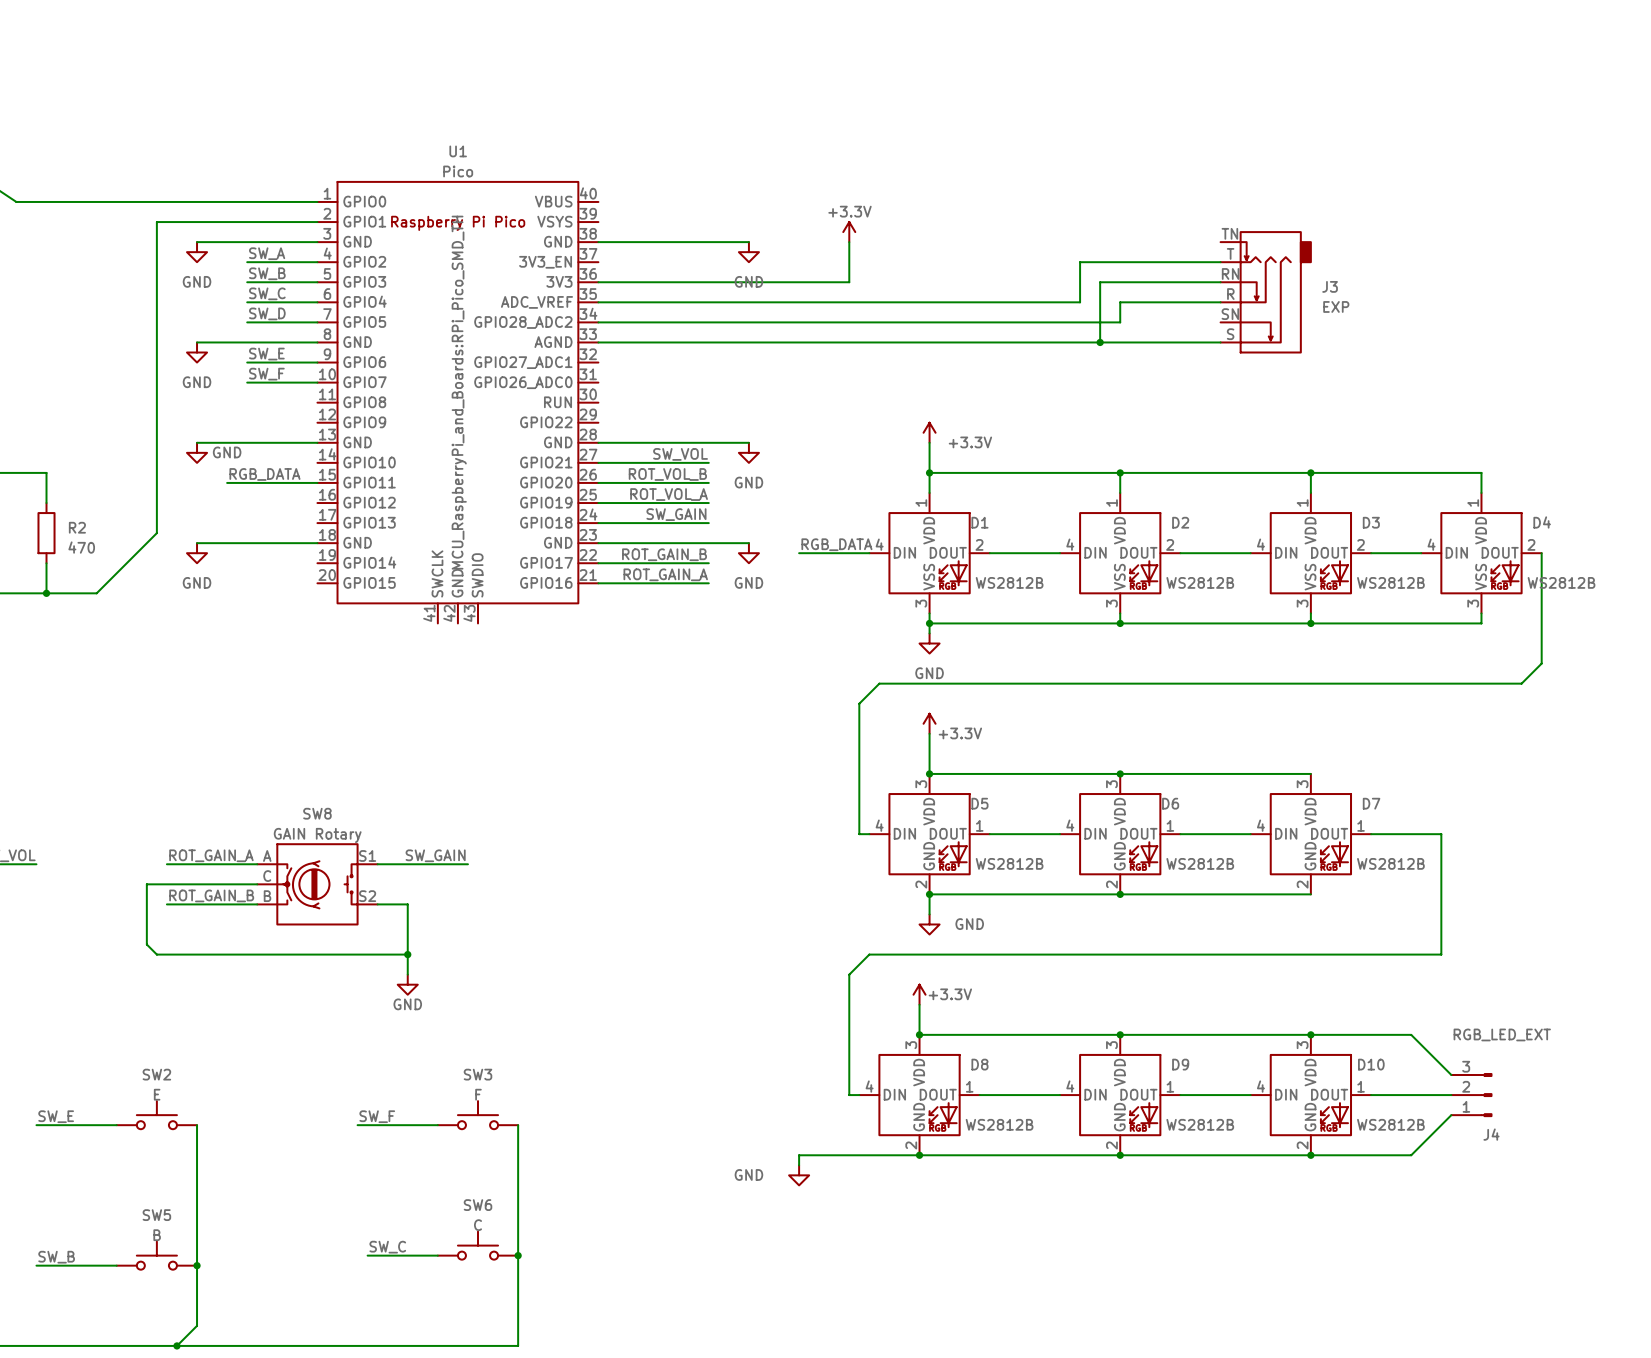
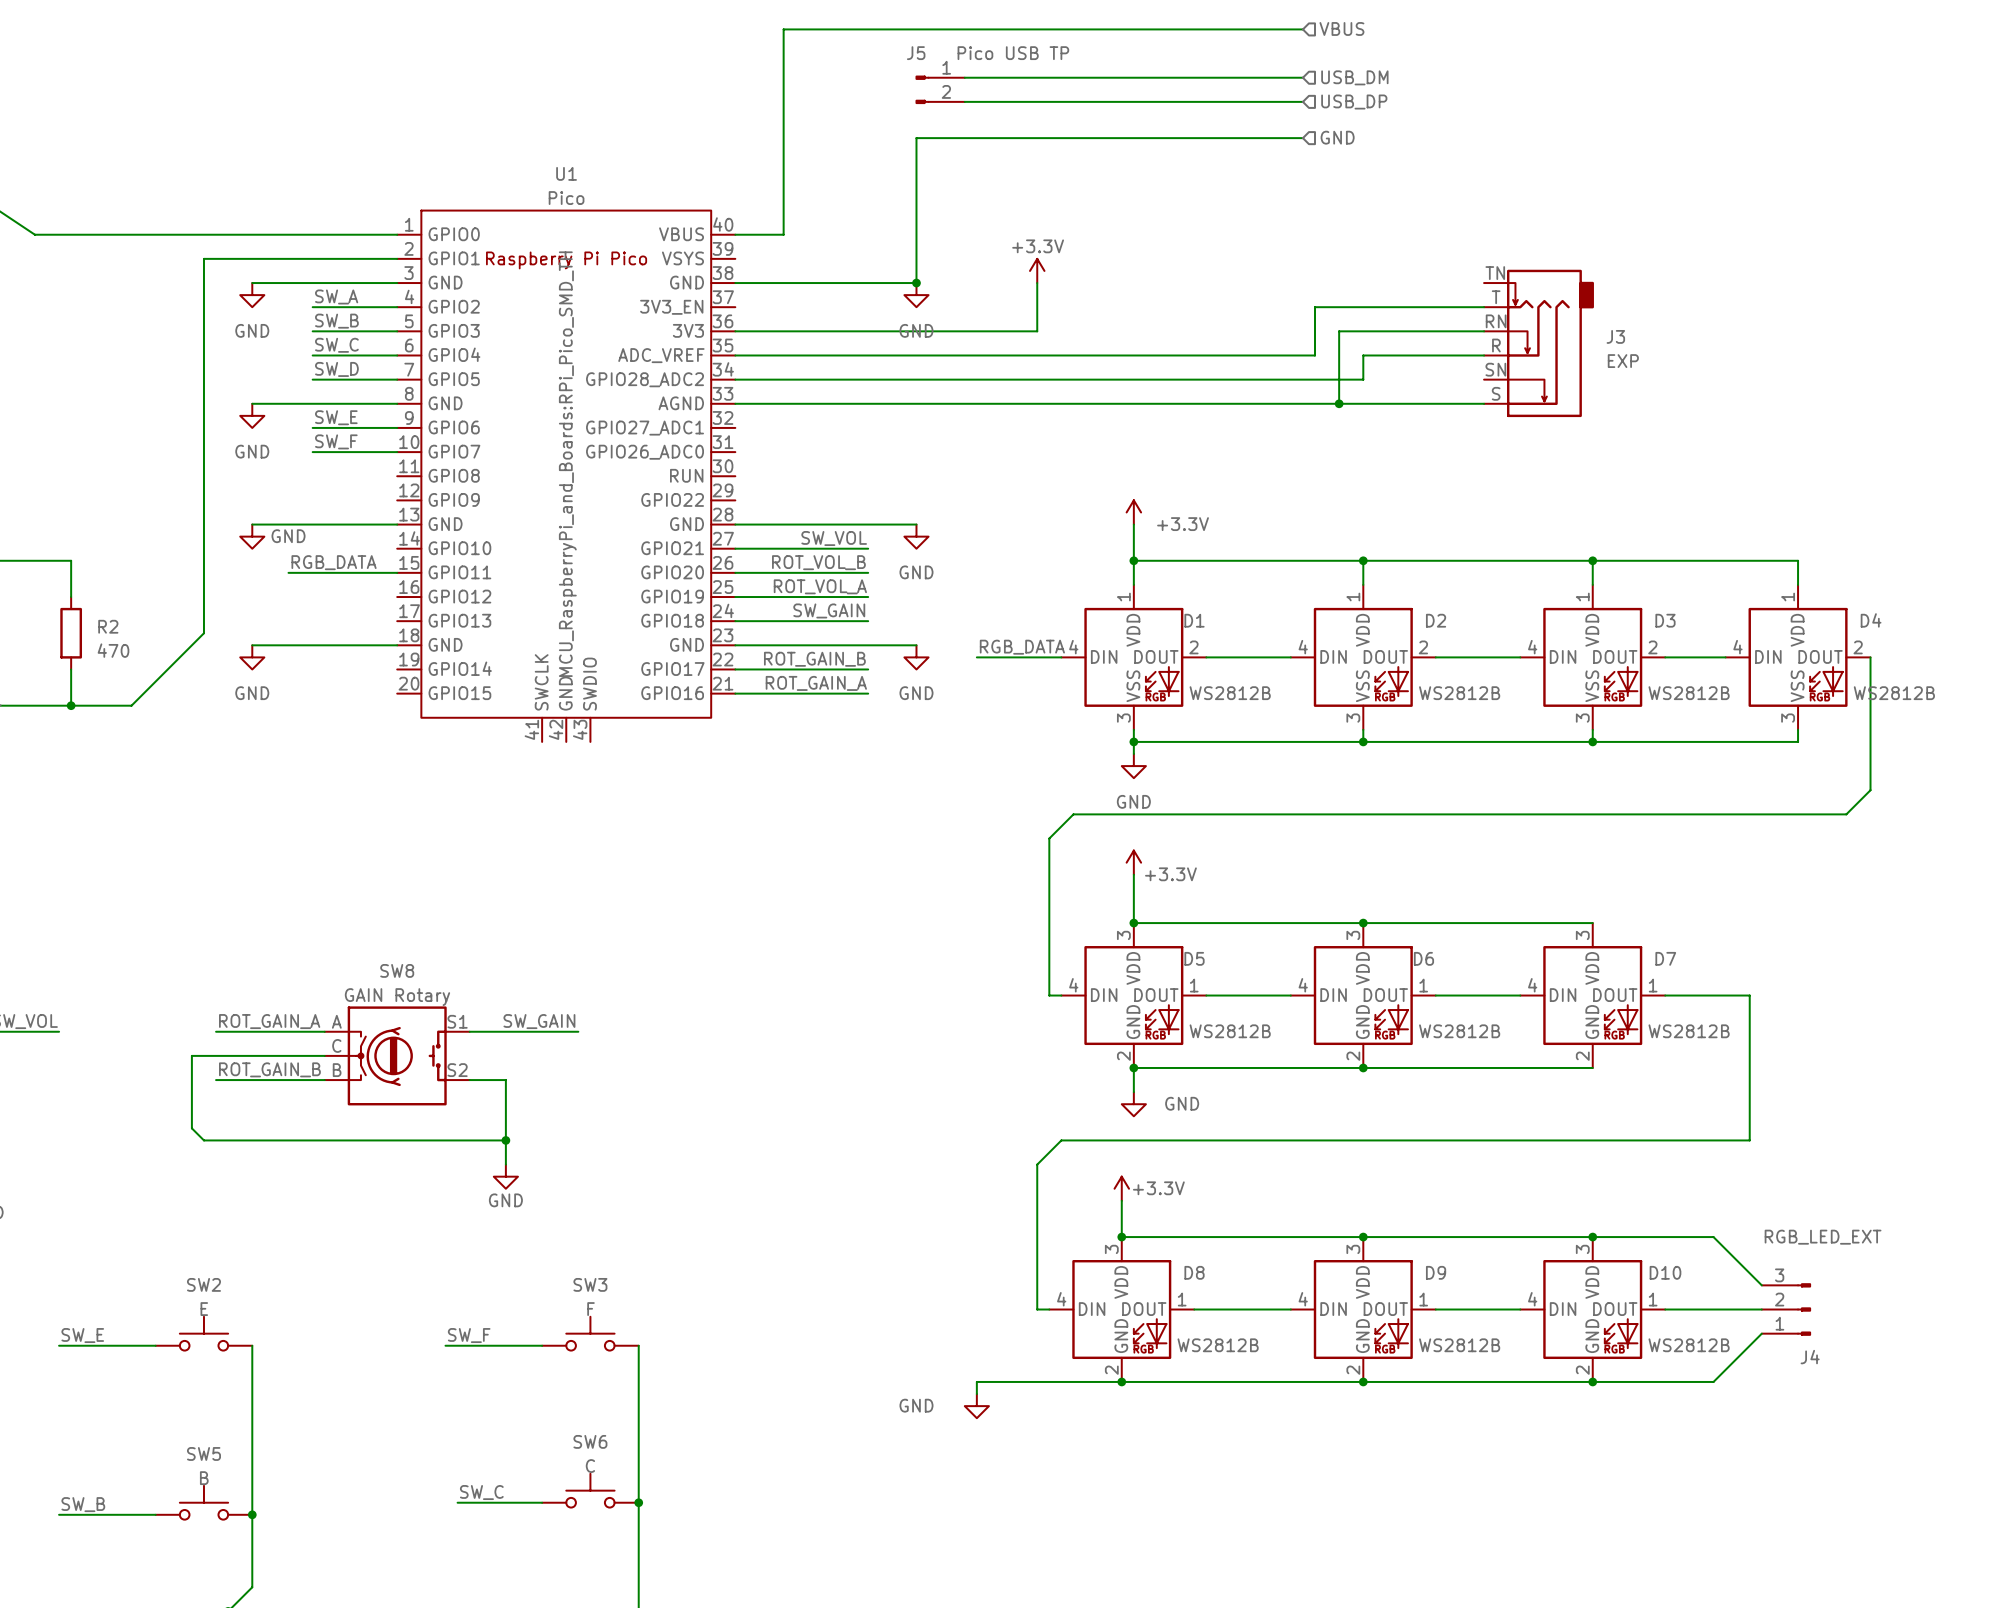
wire: none -> (1302, 29) (783, 29) (783, 234) (735, 234)
hierarchical label: none -> VBUS (1341, 28)
wire: none -> (964, 77) (1302, 77)
hierarchical label: none -> USB_DM (1354, 77)
J5: none -> Pico USB TP (940, 89)
wire: none -> (964, 101) (1302, 101)
hierarchical label: none -> USB_DP (1354, 102)
wire: none -> (1302, 138) (916, 138) (916, 283)
hierarchical label: none -> GND (1337, 137)
junction: none -> (916, 283)

